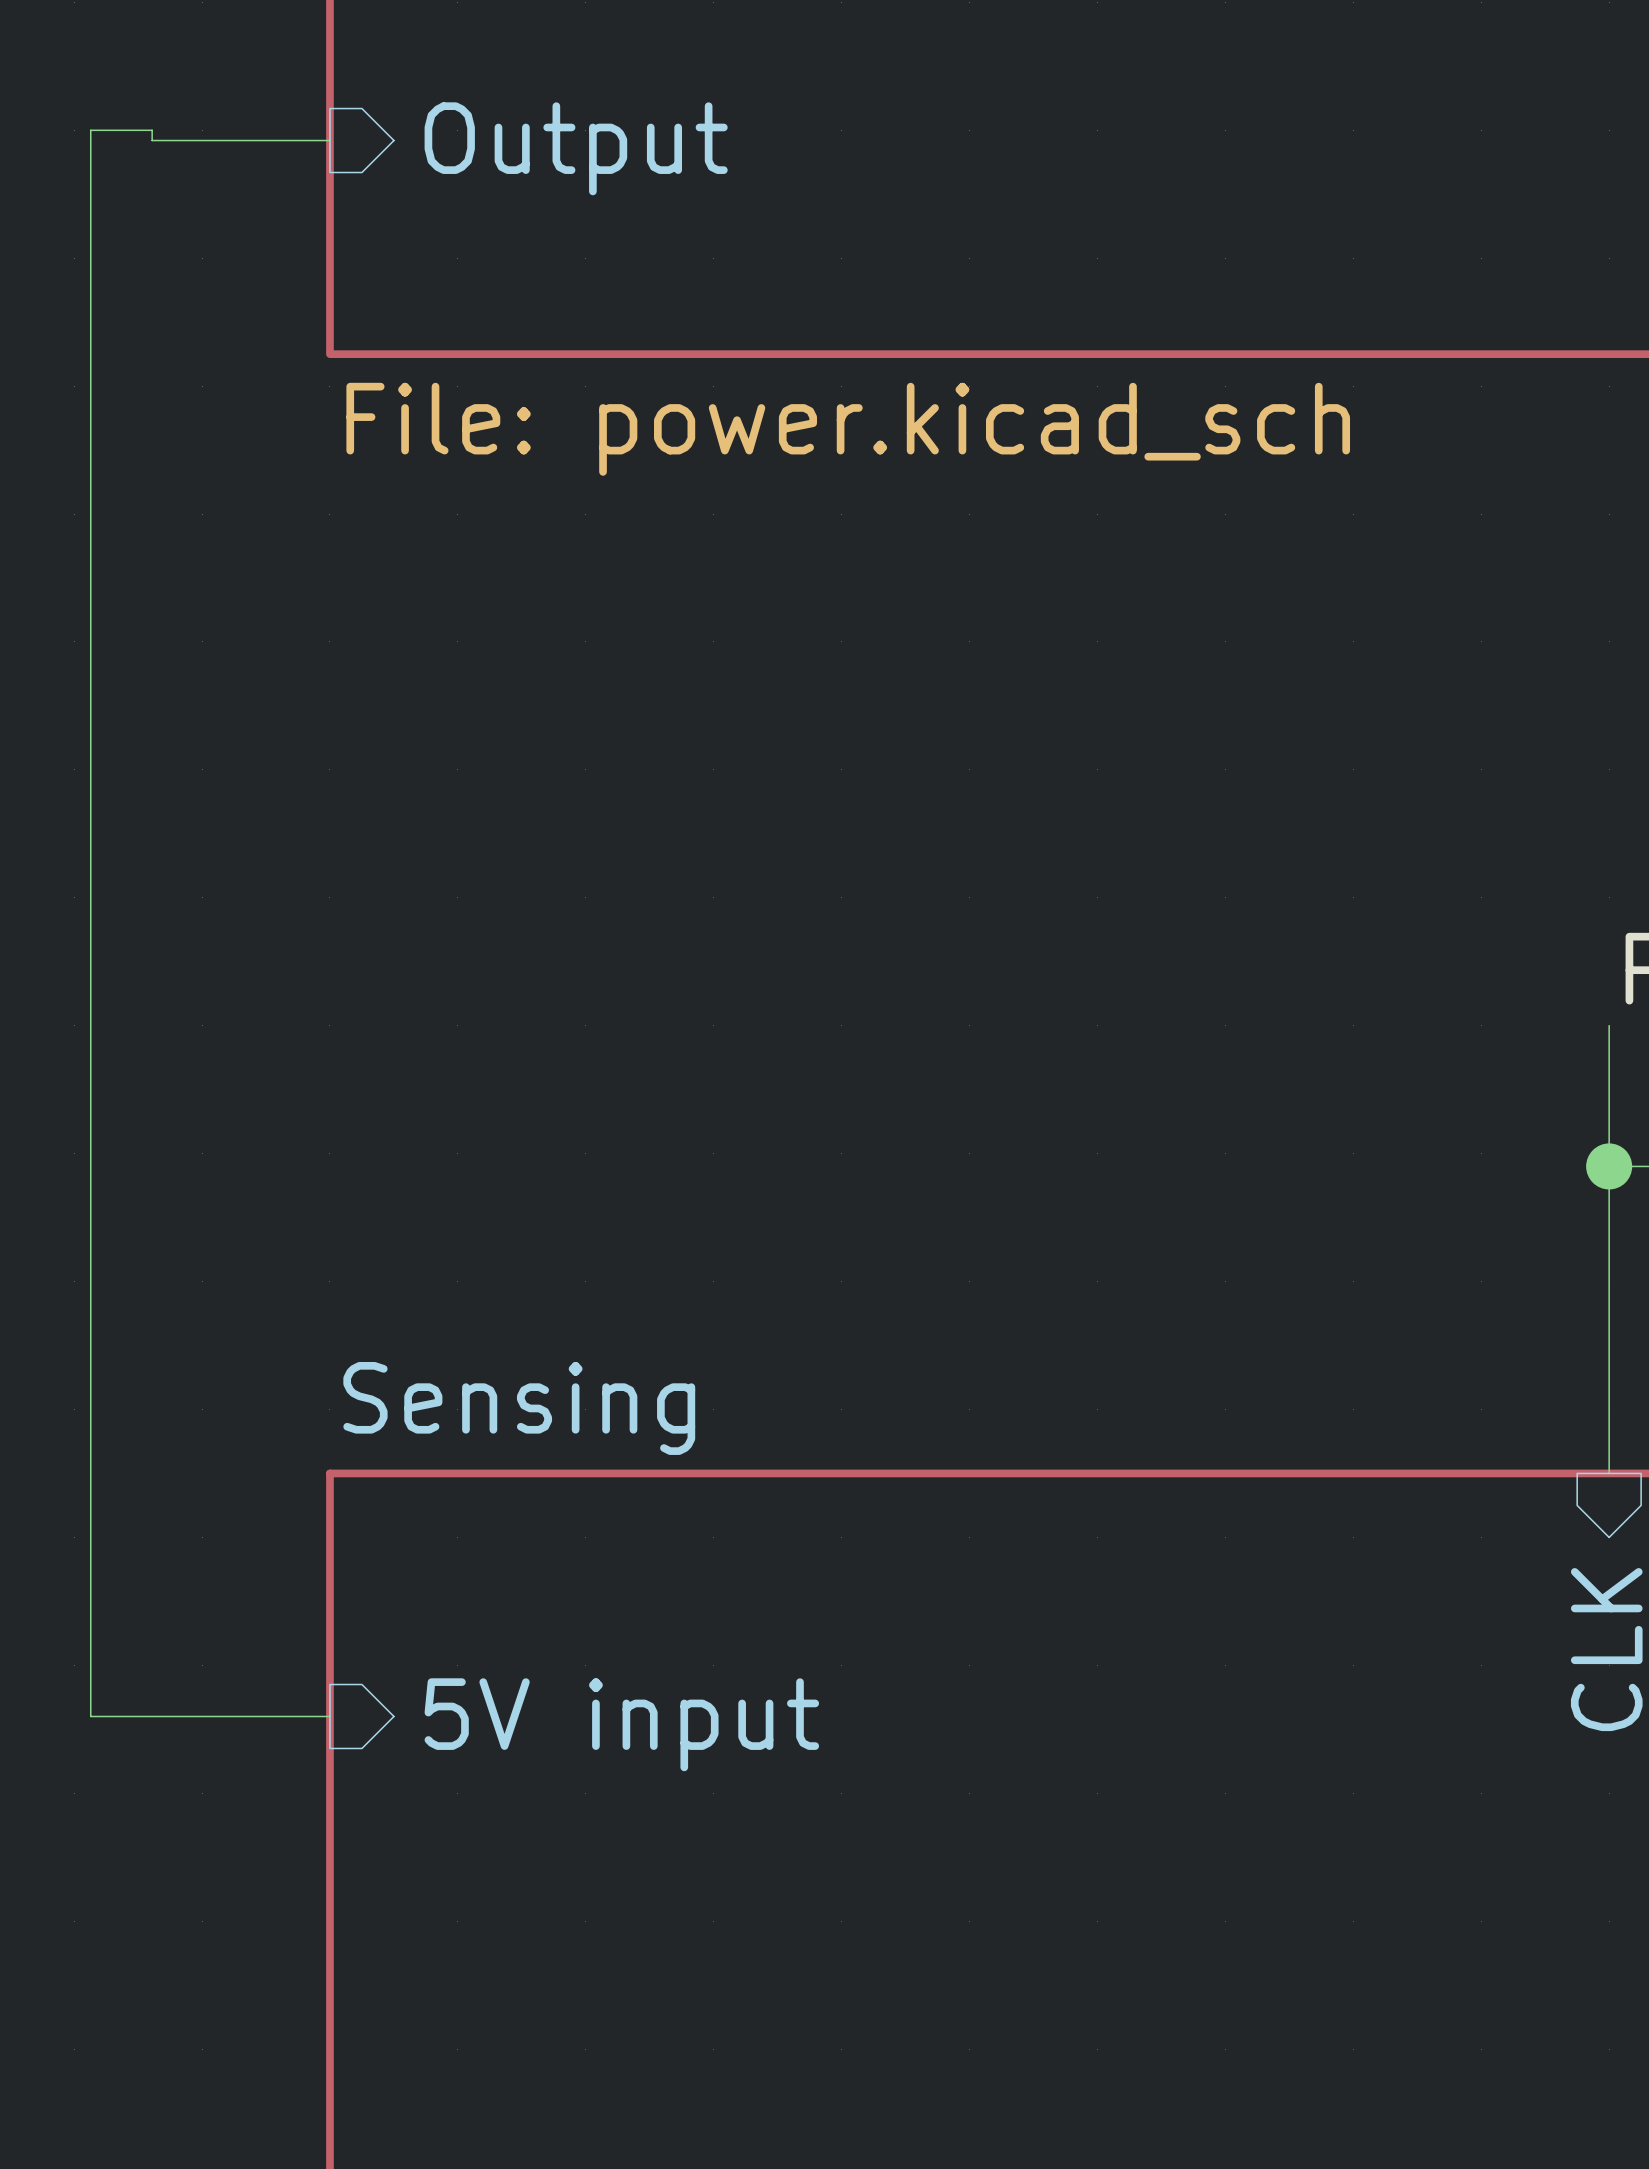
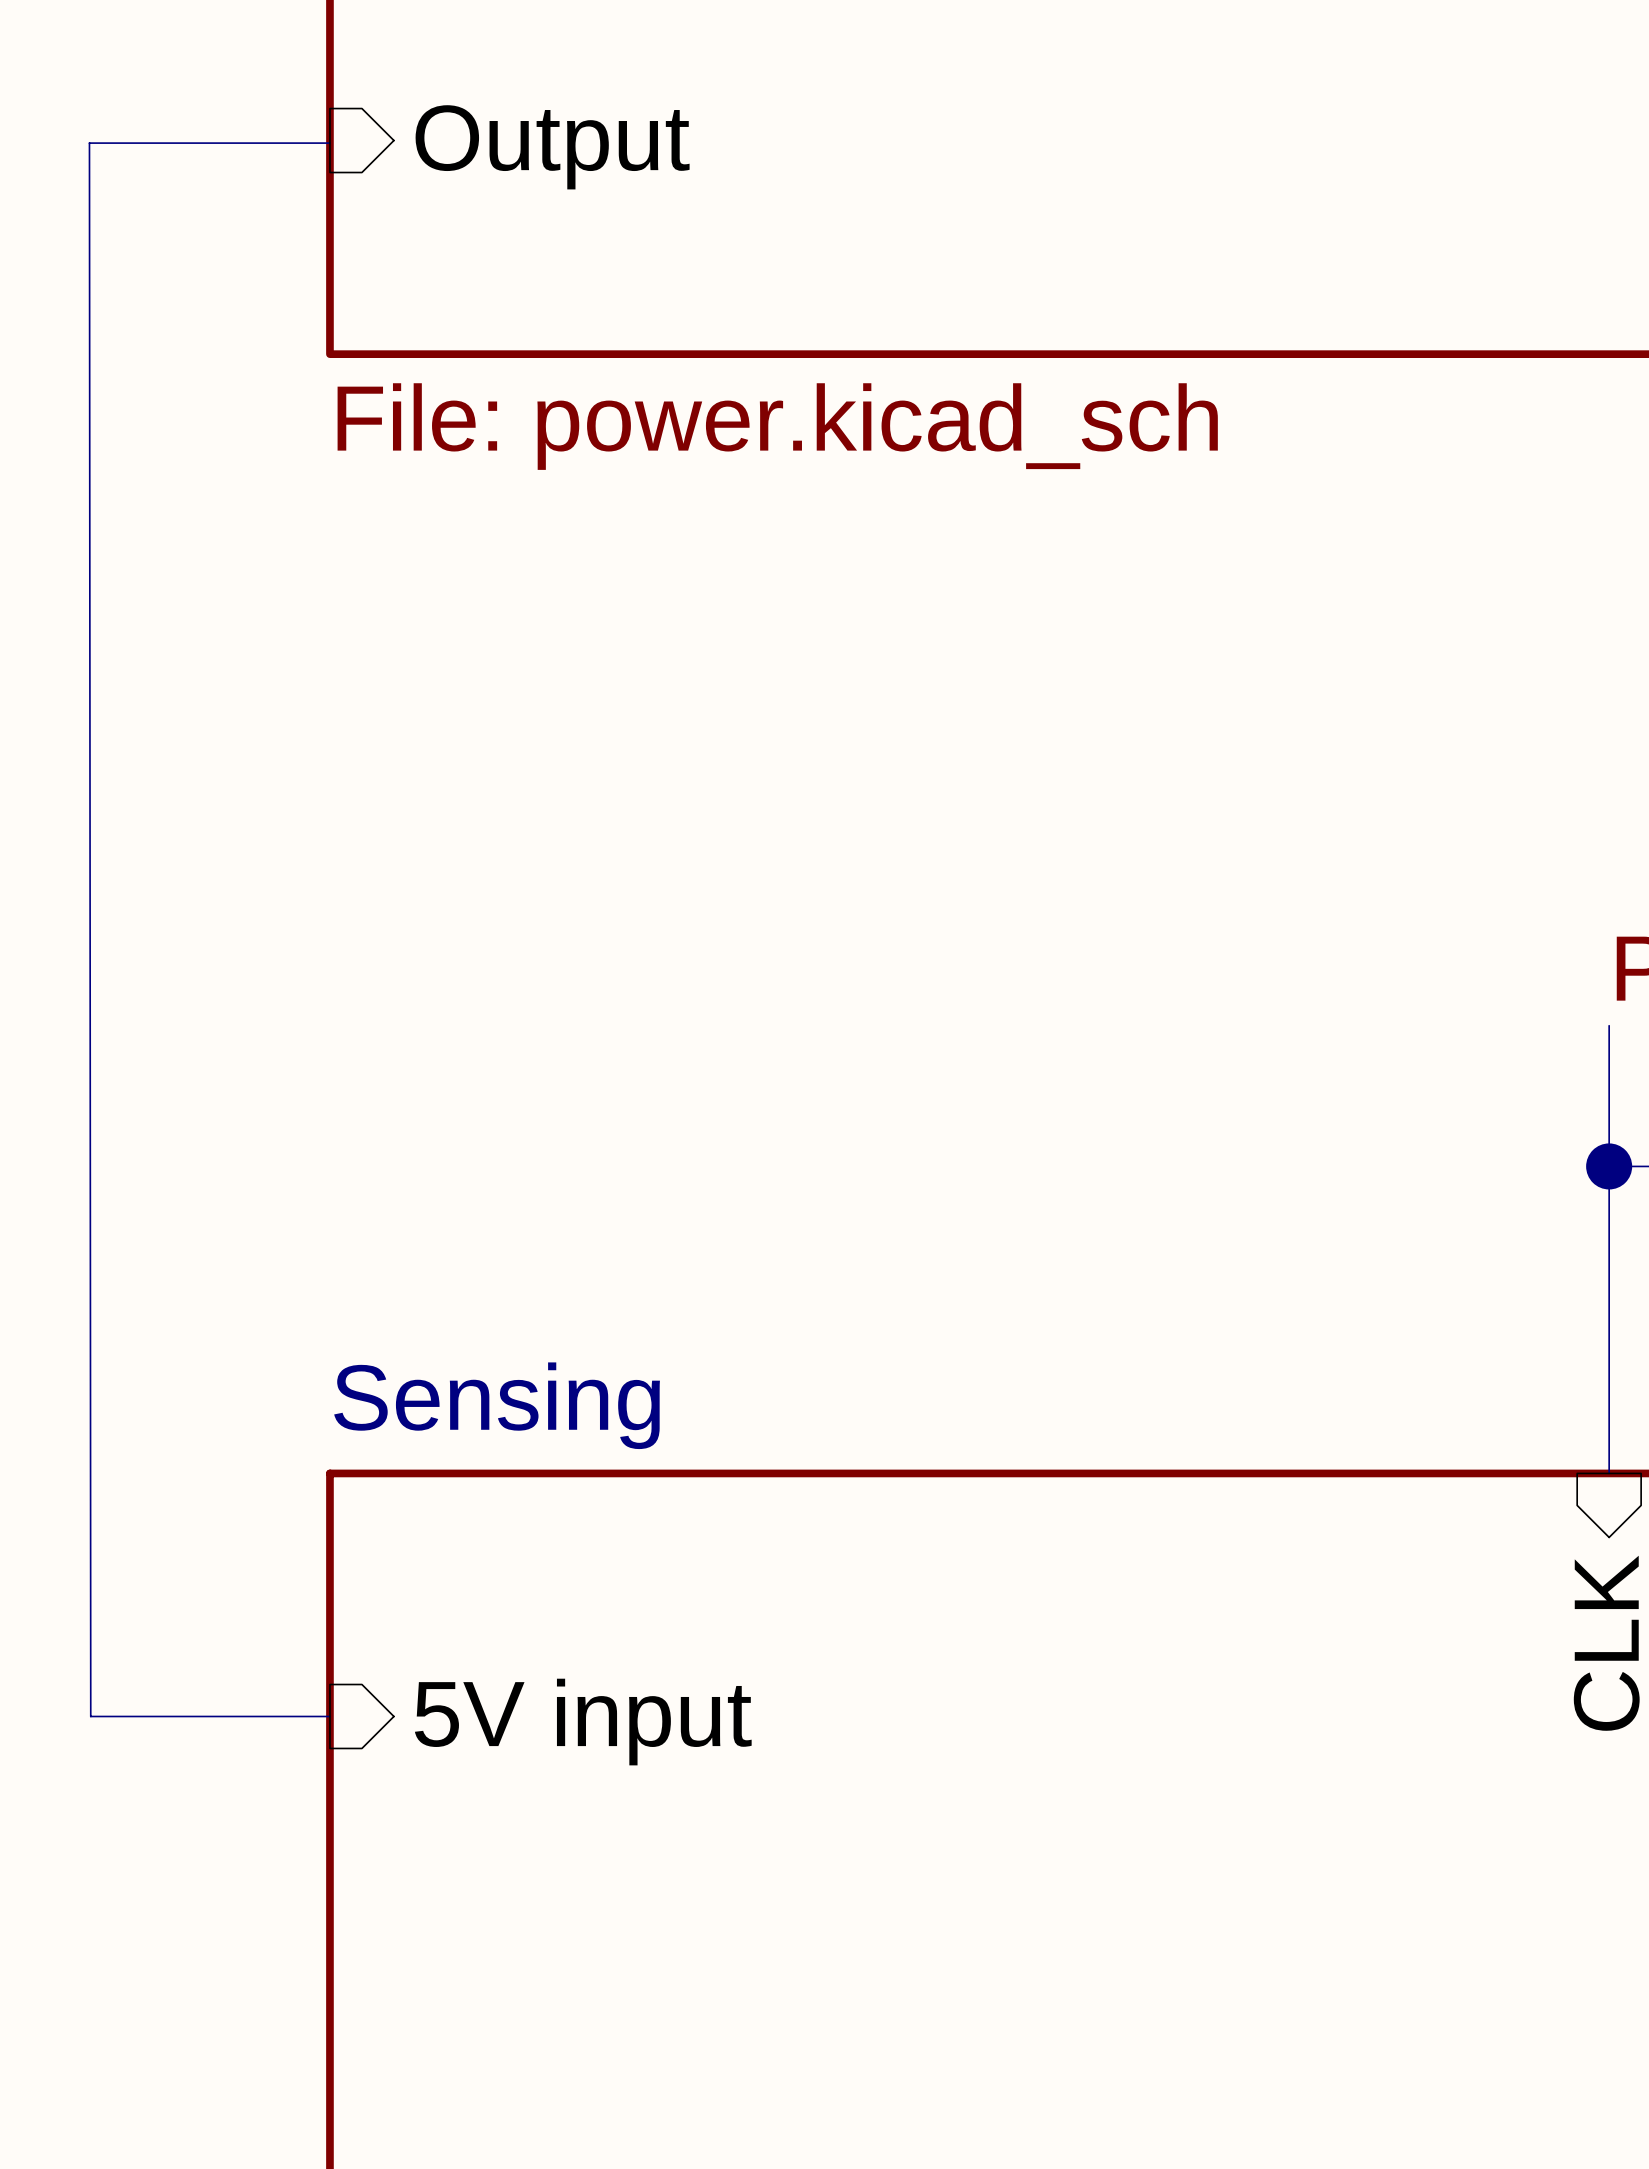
wire: (329, 140) (152, 140) (152, 130) (90, 130) (90, 1716) -> (329, 143) (89, 143) (90, 1716)

